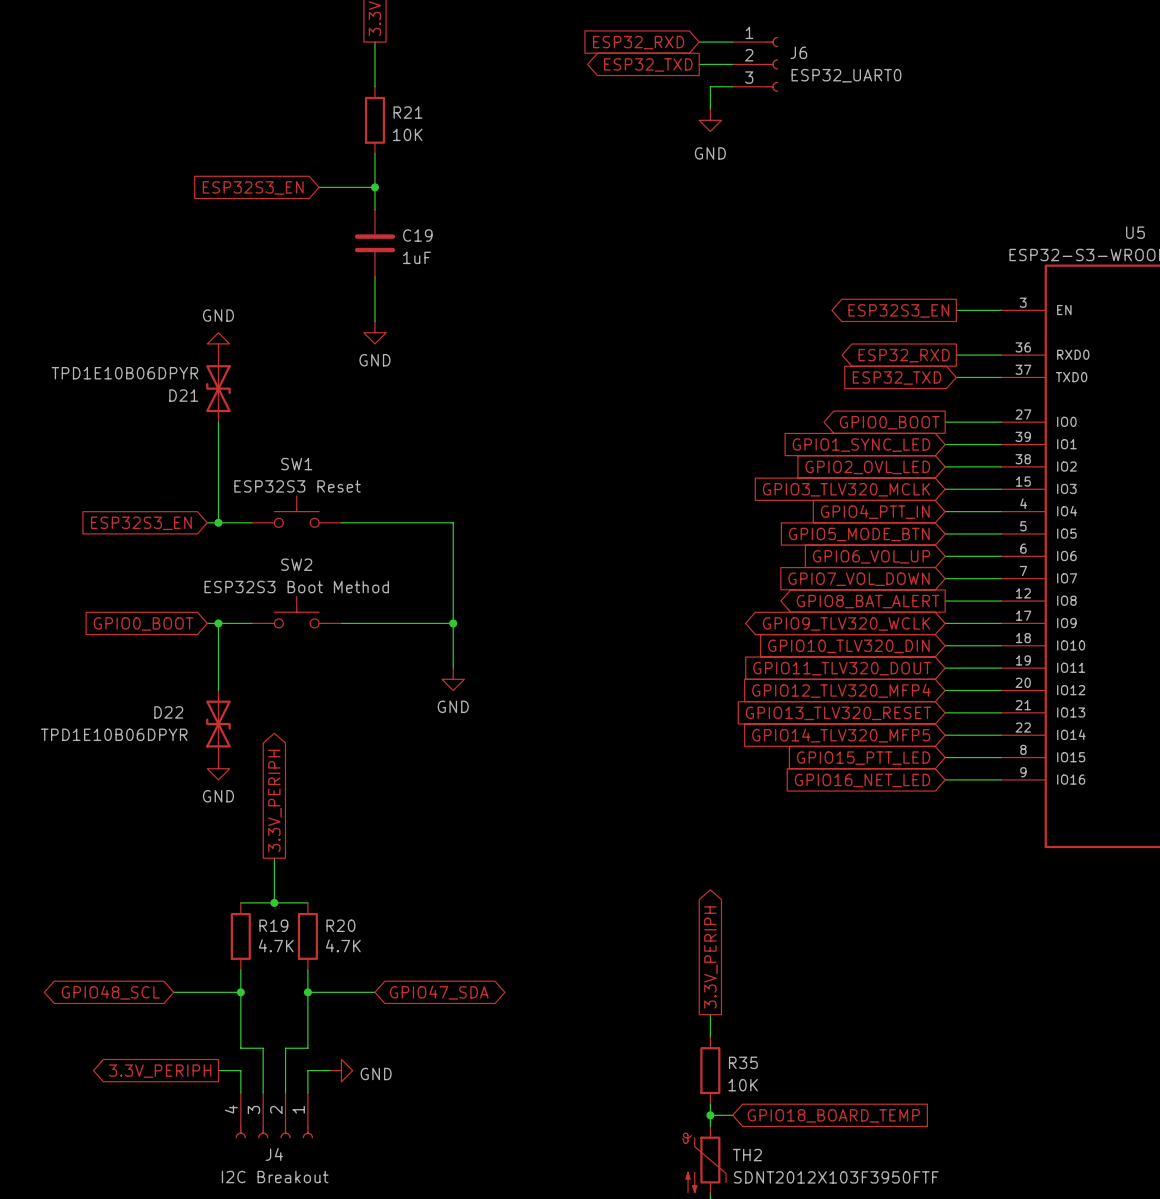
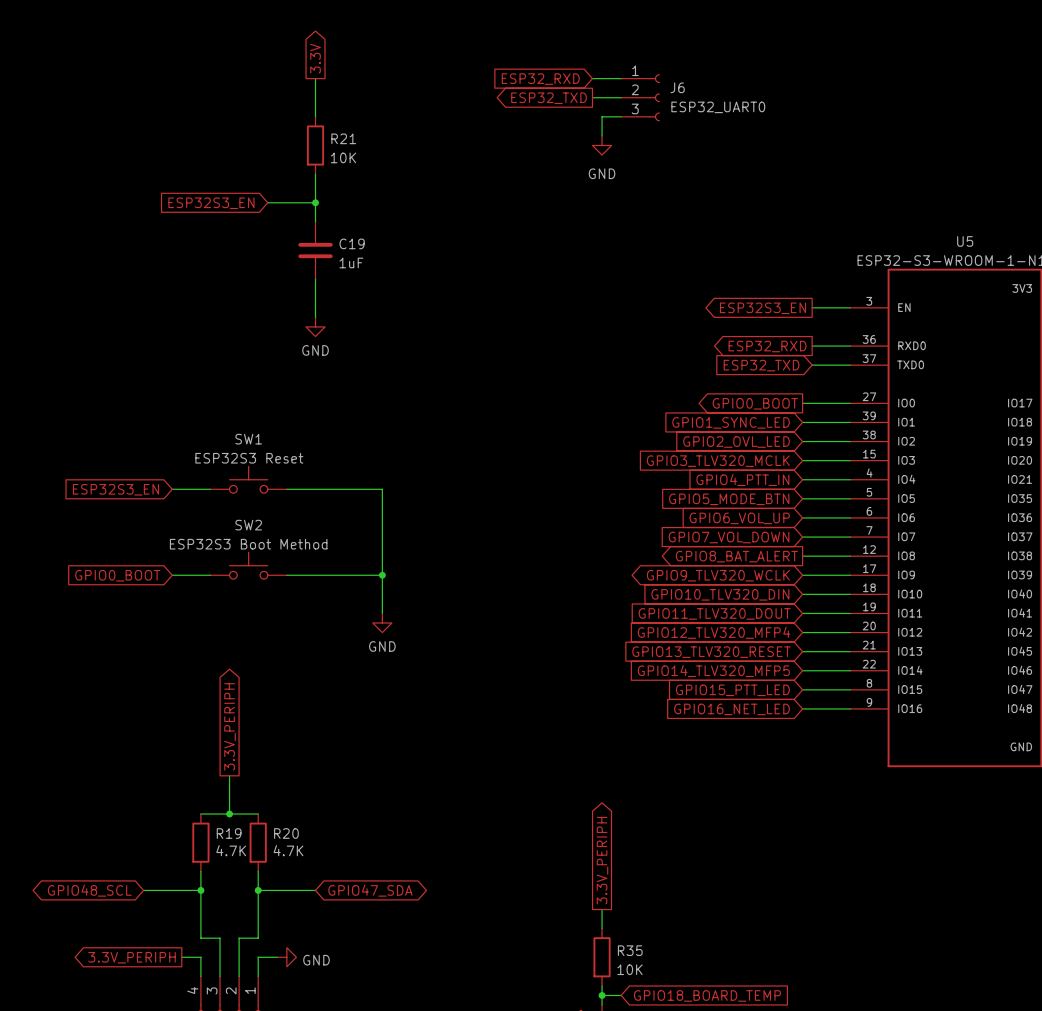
power symbol: GND (218, 343) -> none
D21: TPD1E10B06DPYR (218, 388) -> none
wire: (218, 422) (218, 522) -> none
junction: (218, 522) -> none
wire: (218, 623) (218, 690) -> none
junction: (218, 623) -> none
D22: TPD1E10B06DPYR (218, 724) -> none
power symbol: GND (218, 768) -> none

